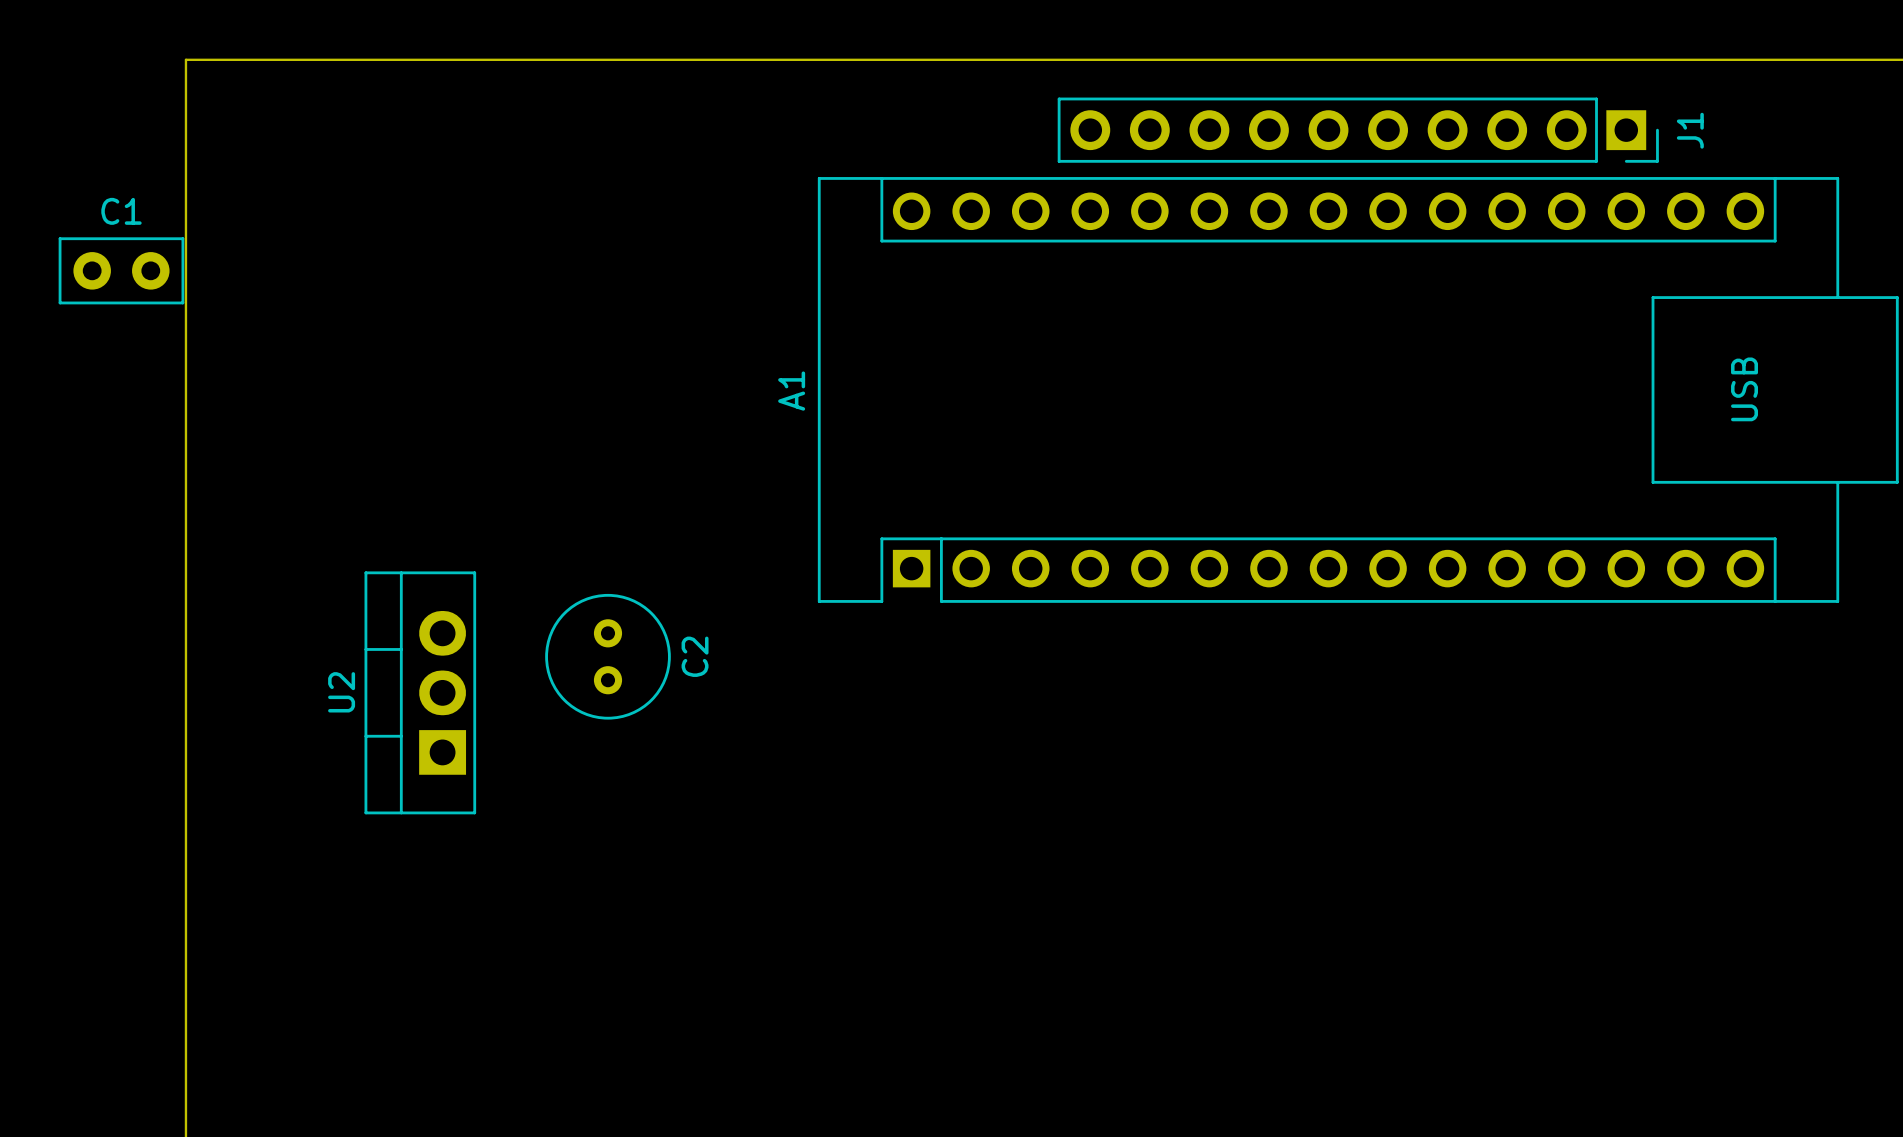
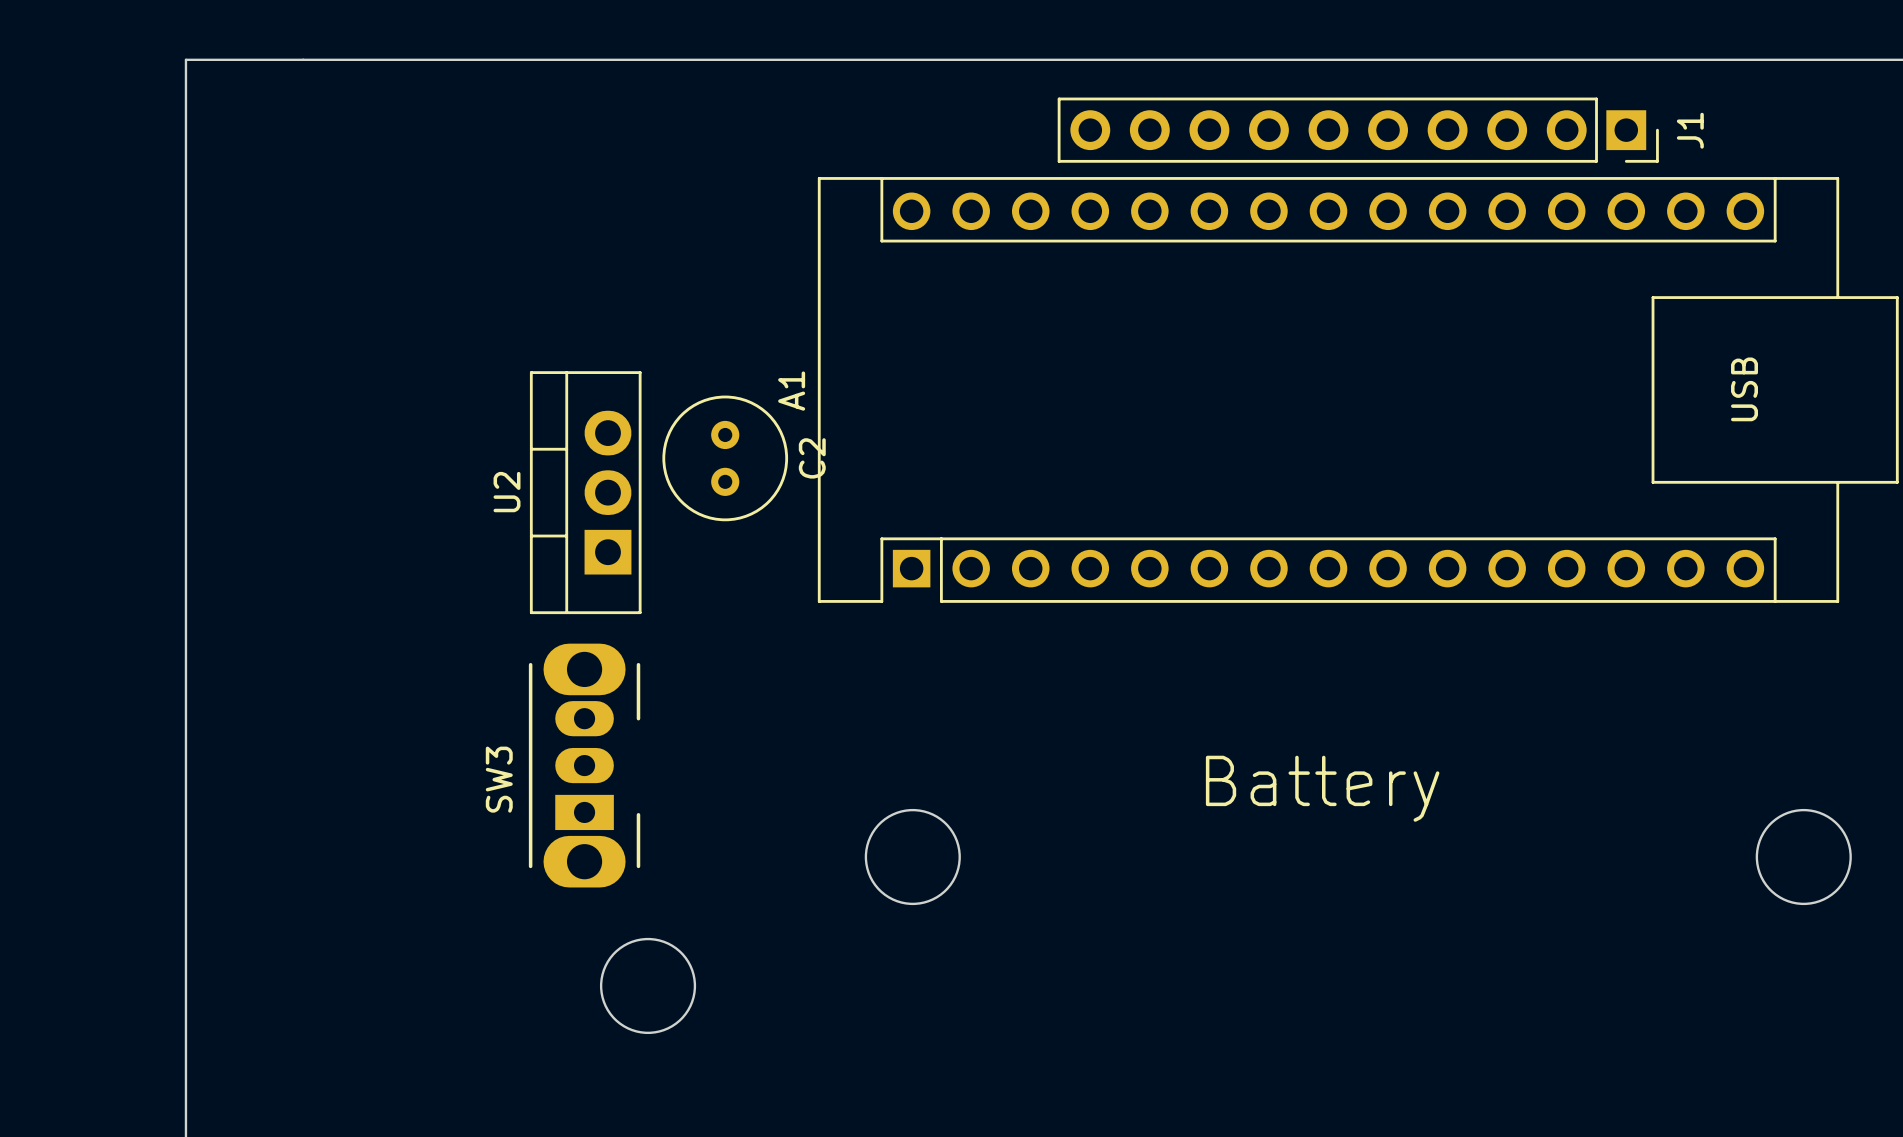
C1: (121, 270) -> none
C2 position: (608, 656) -> (725, 458)
U2 position: (420, 692) -> (585, 492)
SW3: none -> (584, 765)
text: none -> Battery (1322, 788)
round board edge: none -> [864, 808, 961, 906]
round board edge: none -> [1755, 808, 1852, 906]
round board edge: none -> [599, 937, 697, 1035]

